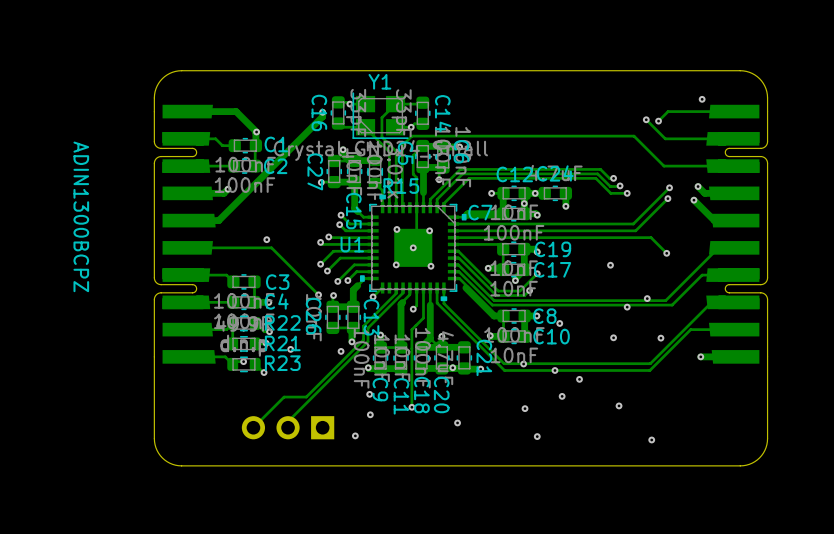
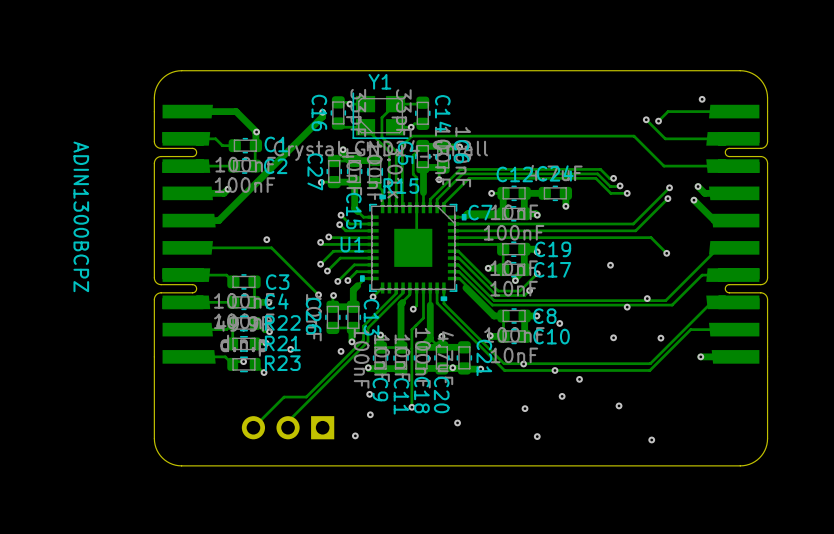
via: (535, 193) -> none
via: (524, 203) -> none
via: (396, 229) -> none
via: (429, 230) -> none
via: (413, 247) -> none
via: (396, 264) -> none
via: (430, 266) -> none

